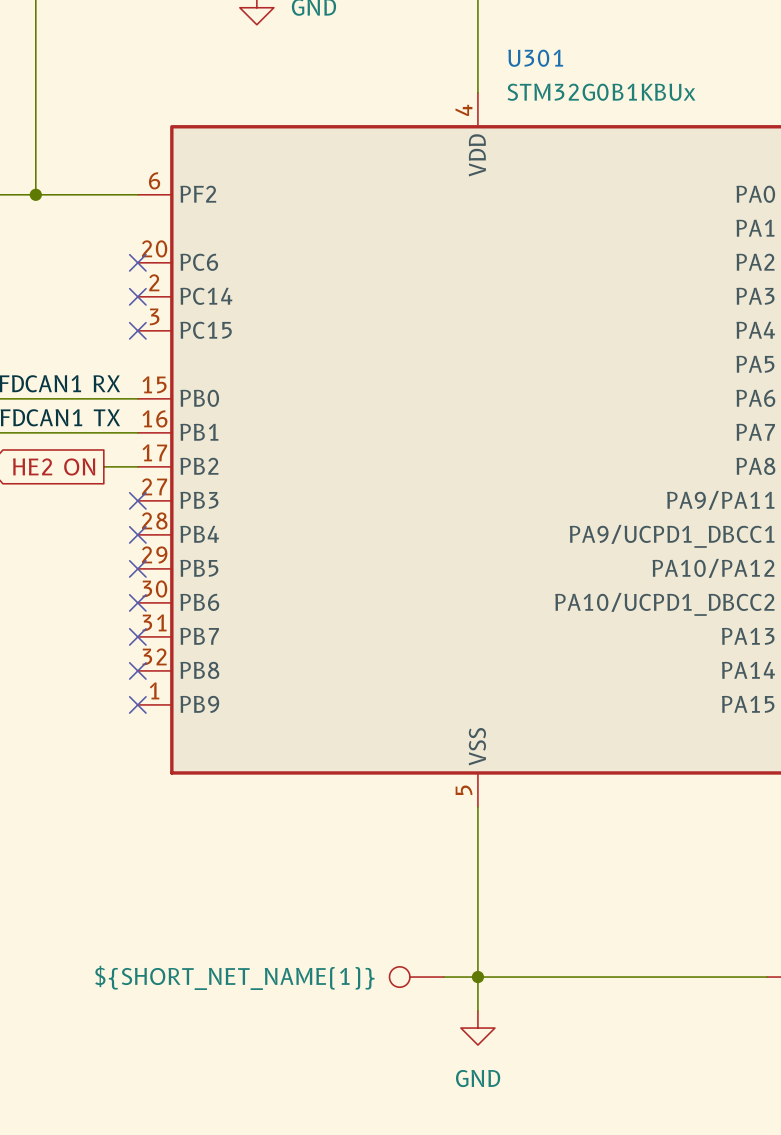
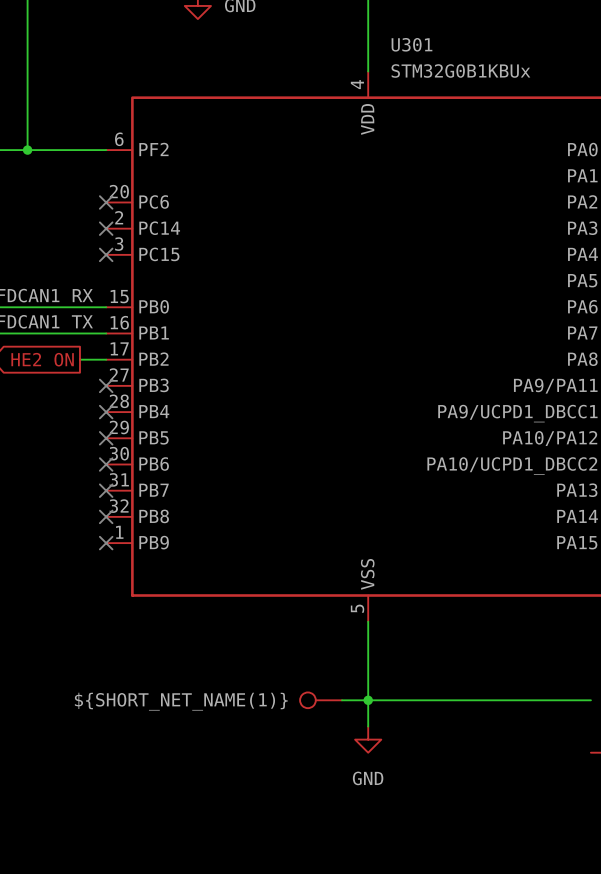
wire: (477, 943) (477, 1011) -> none
part position: (416, 977) -> (321, 700)
wire: (443, 977) (767, 977) -> (342, 700) (590, 700)
junction position: (477, 977) -> (368, 700)
power symbol position: GND (477, 1028) -> GND (368, 739)

